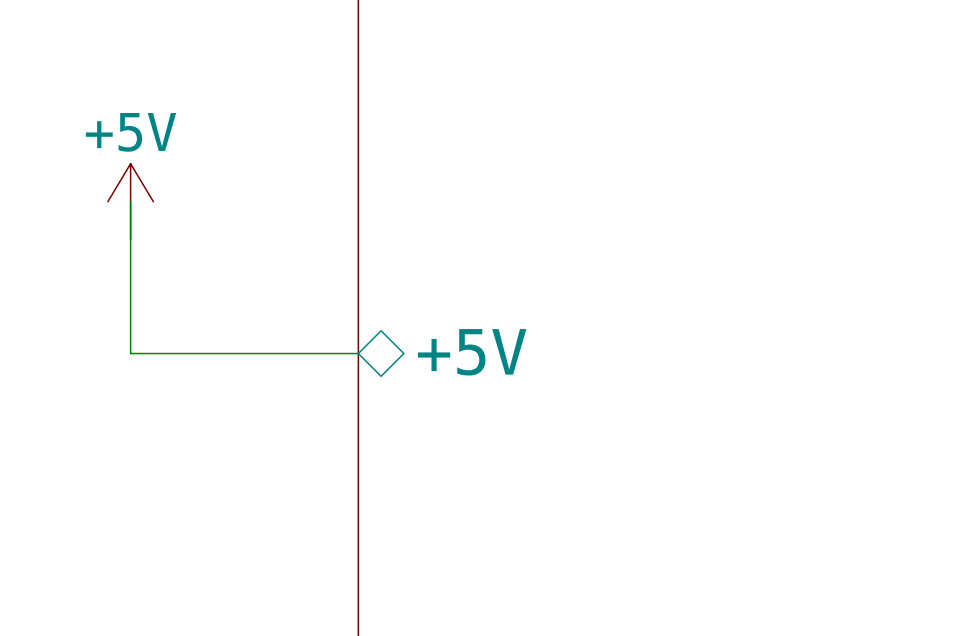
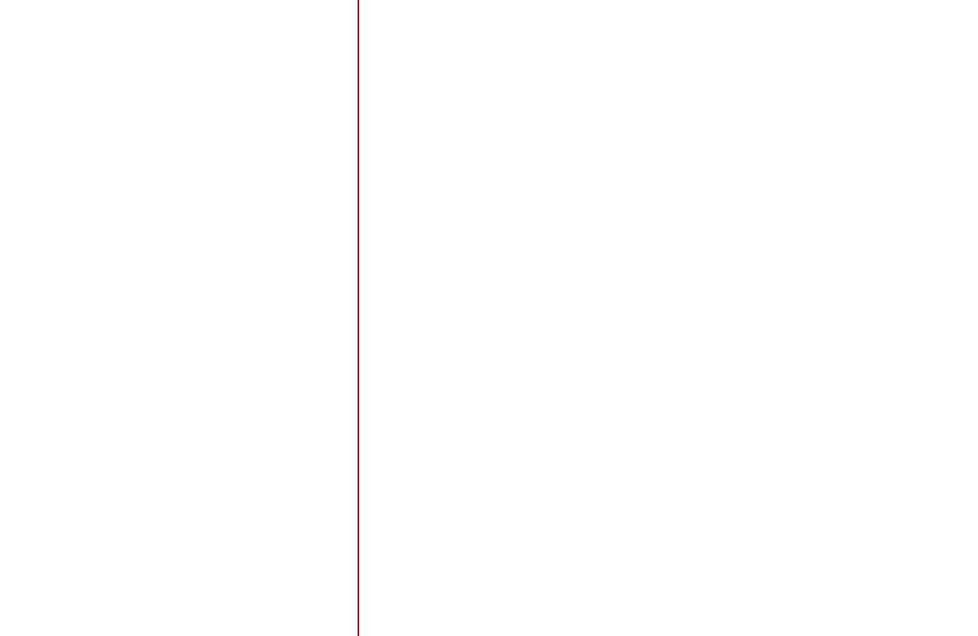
wire: (130, 201) (130, 353) (358, 353) -> none
power symbol: +5V (130, 201) -> none
sheet pin: +5V (472, 352) -> none

